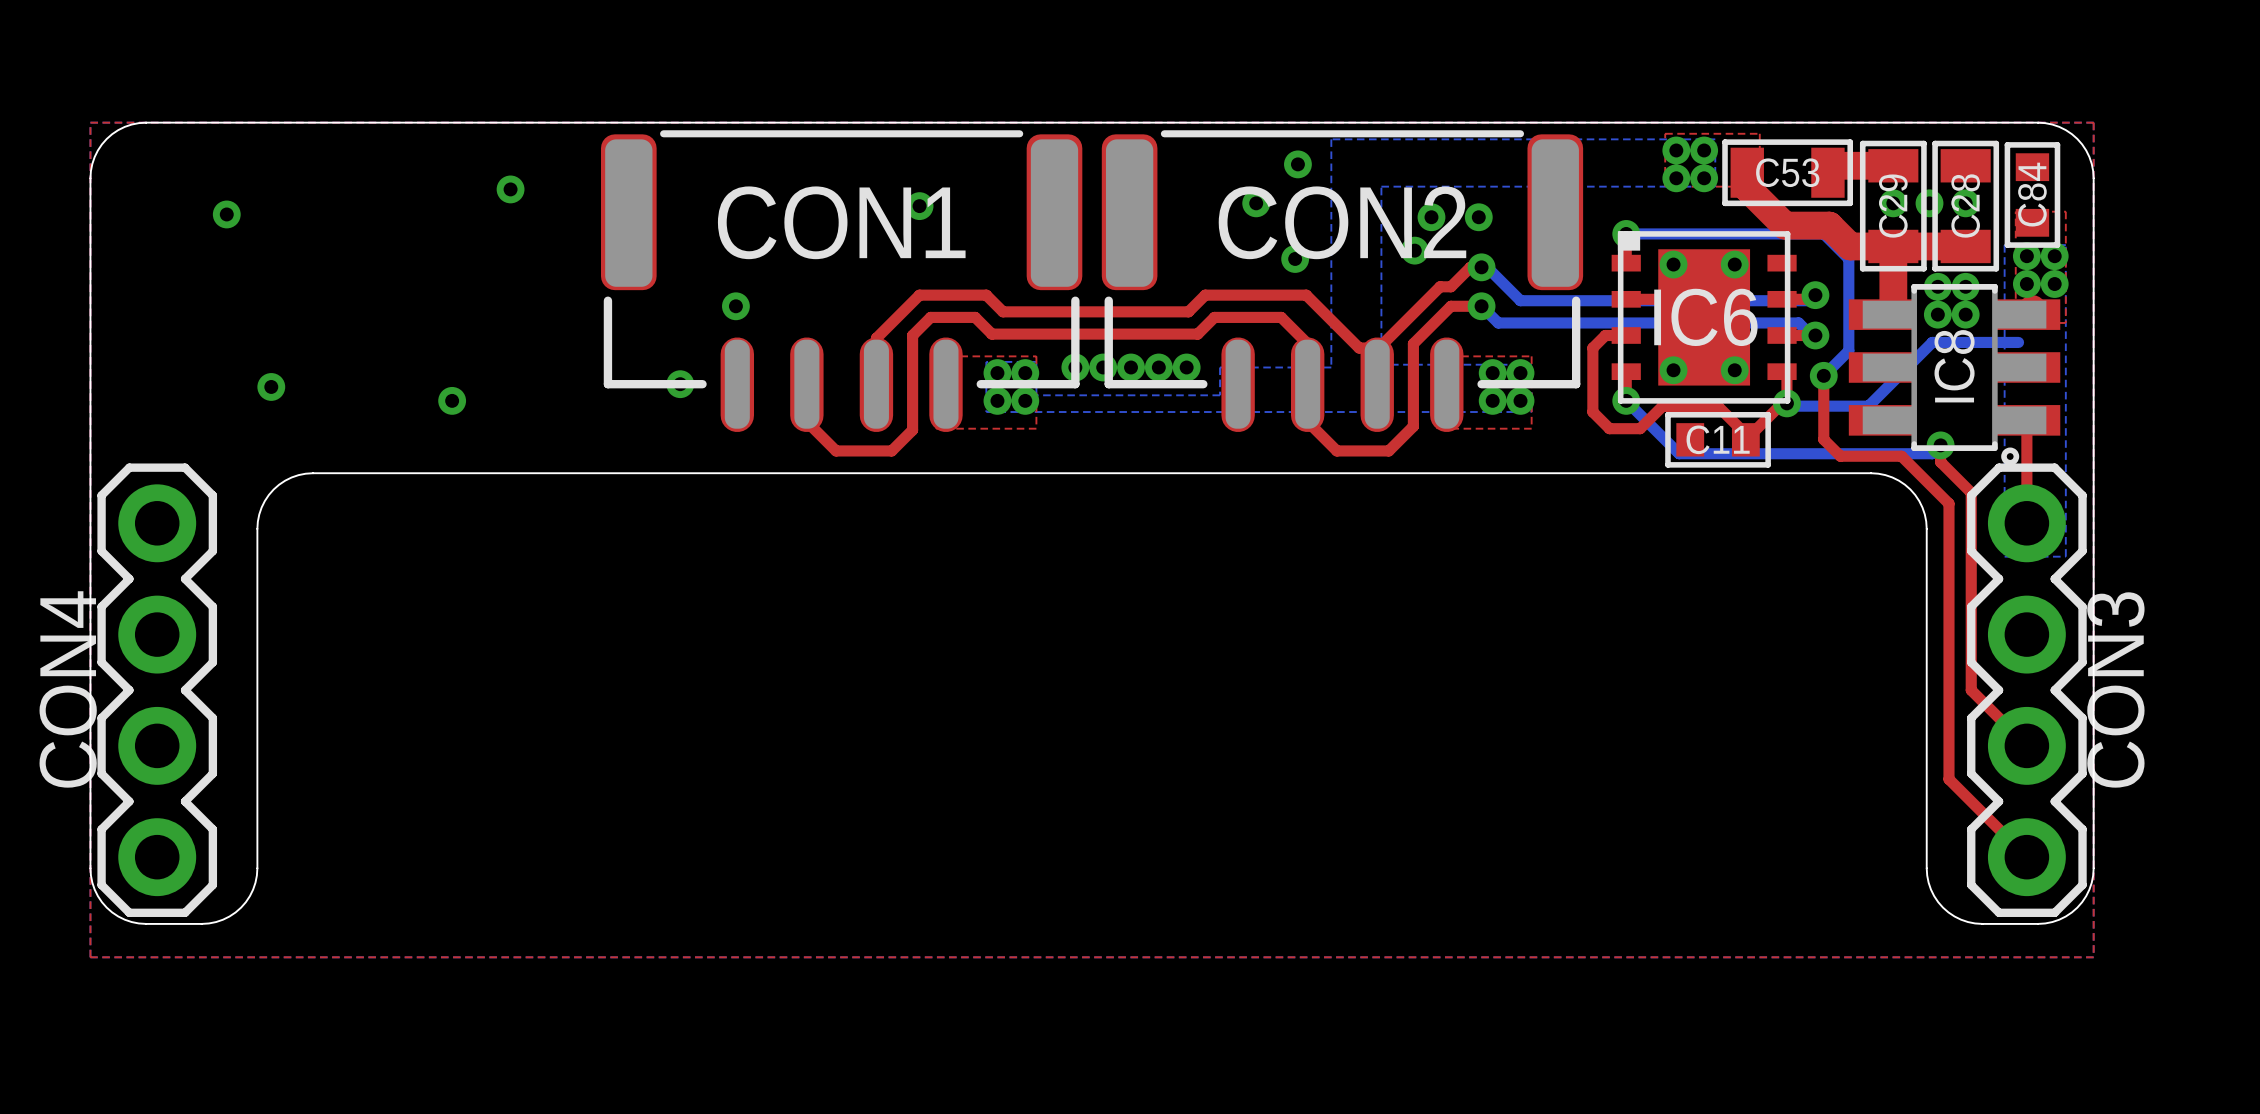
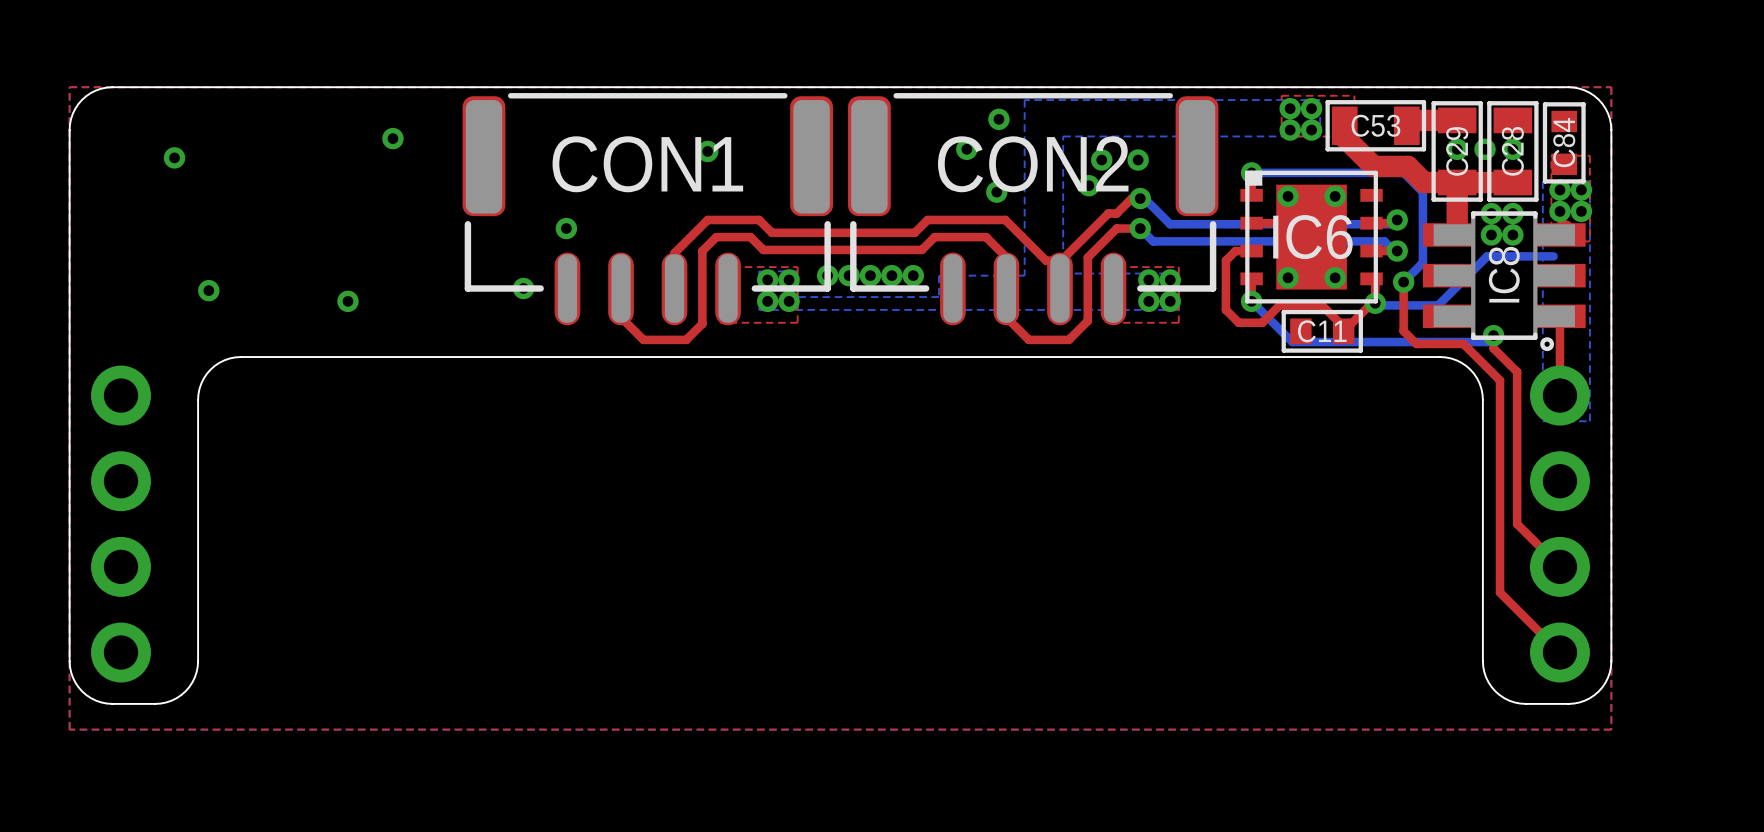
CON4 side: top (157, 690) -> bottom (121, 524)
CON3 side: top (2026, 690) -> bottom (1559, 524)

